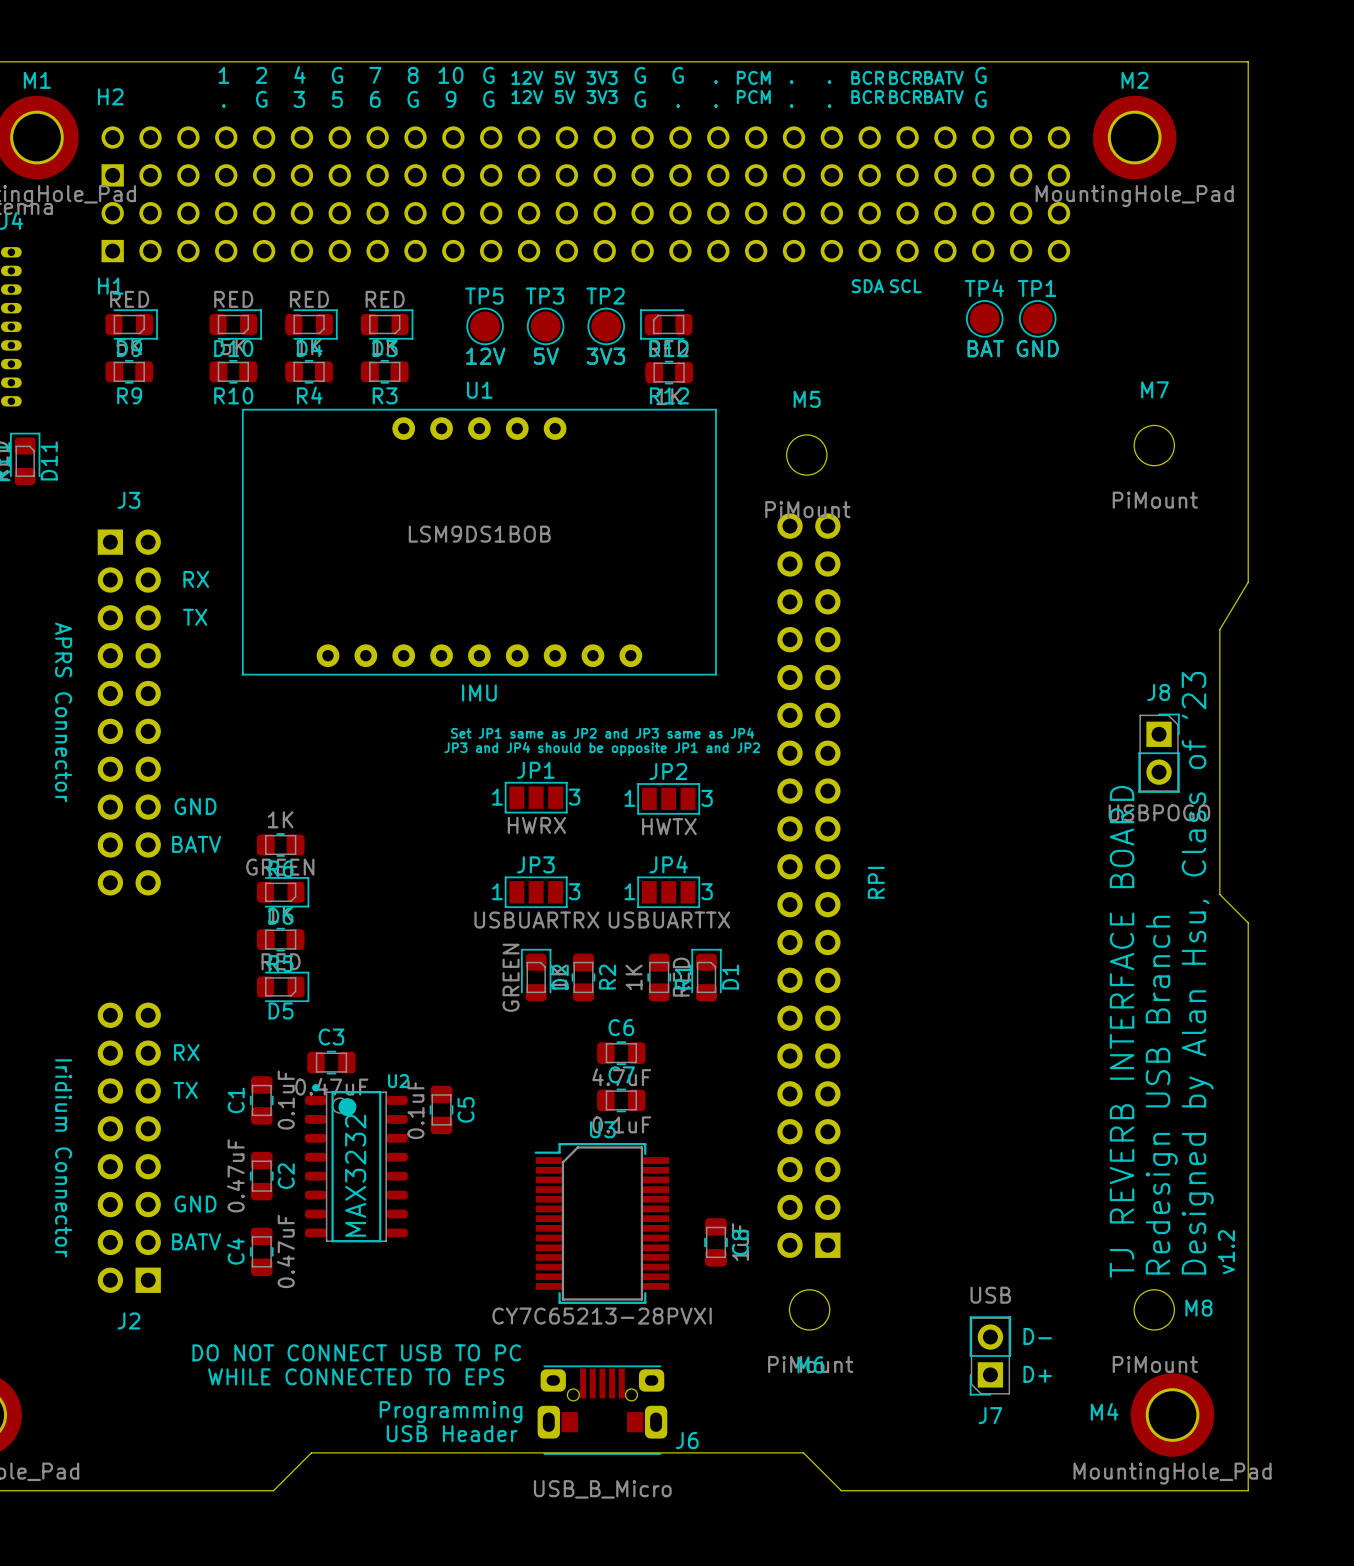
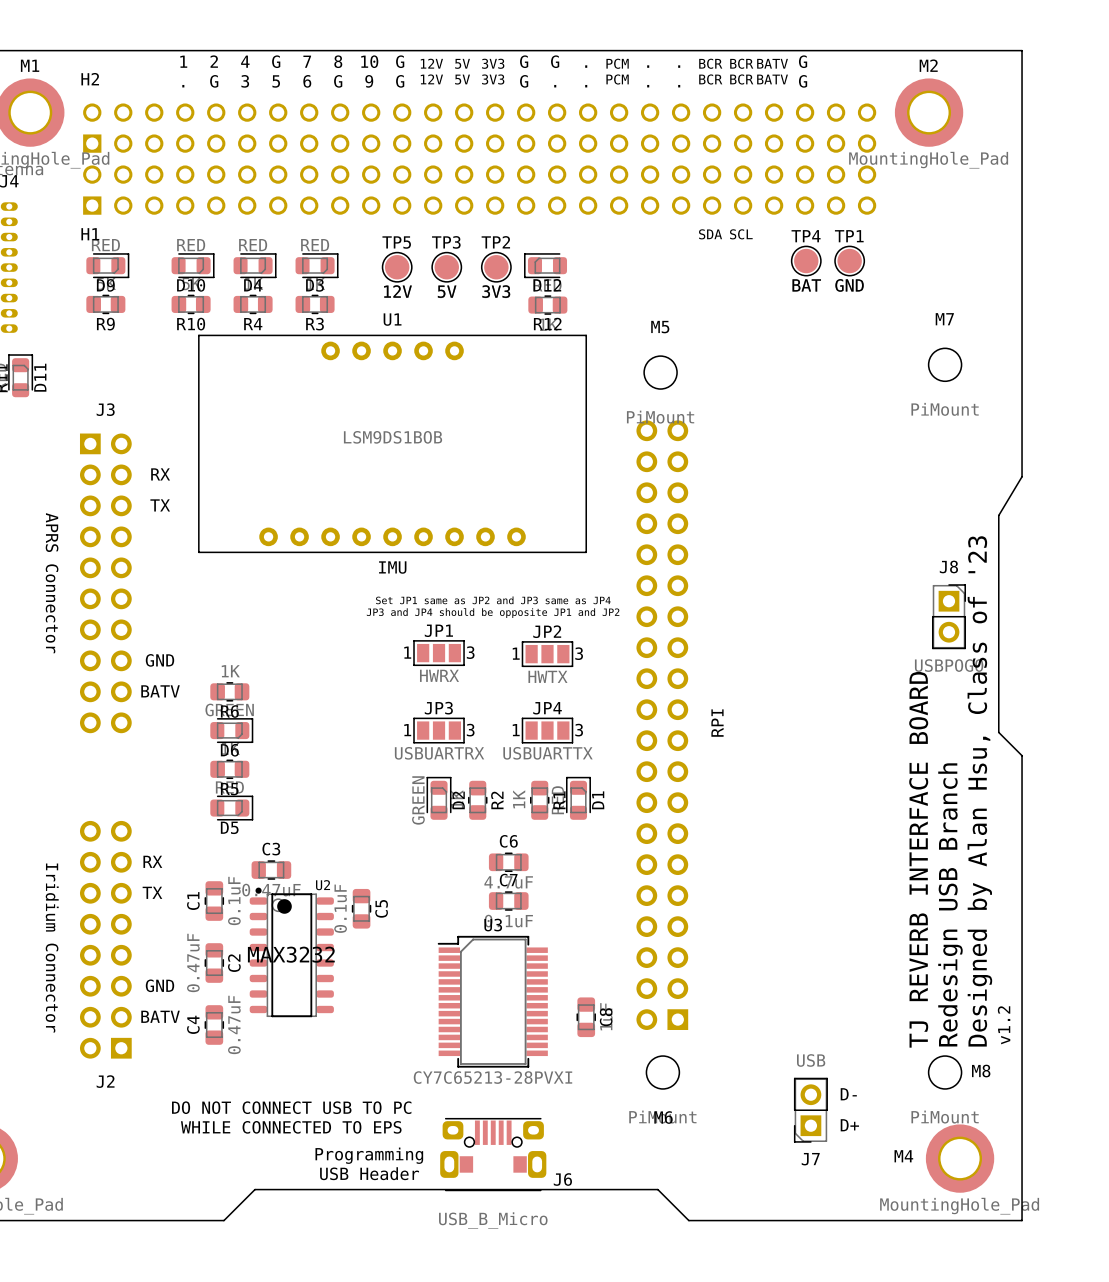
U2 value rotation: 0° (355, 1175) -> 90° clockwise (291, 954)

